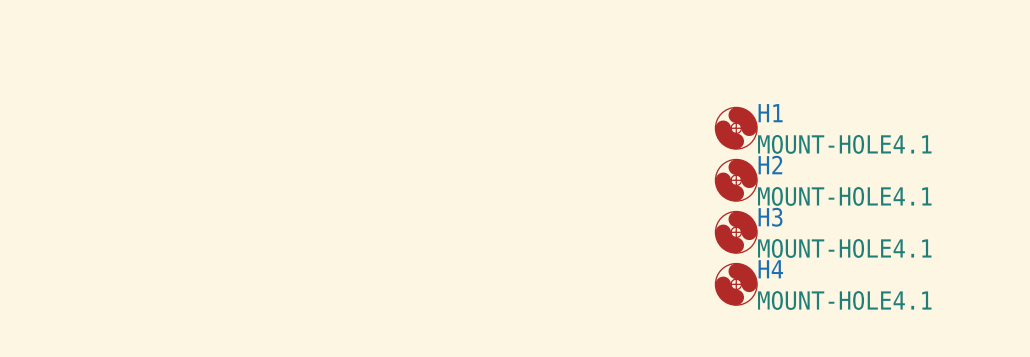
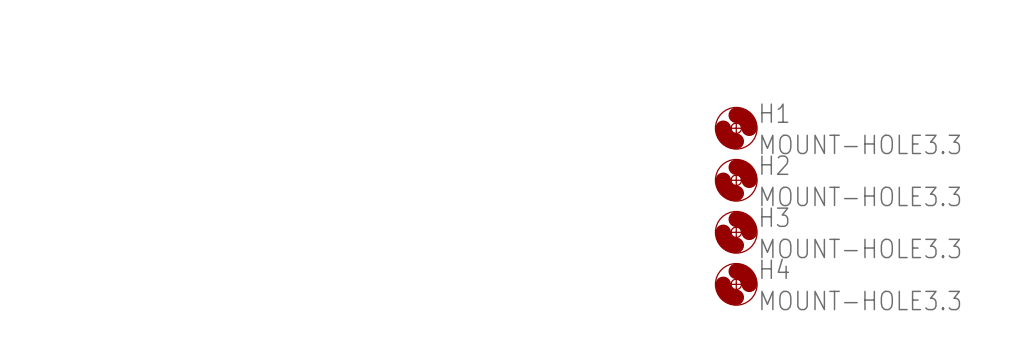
H1 value: MOUNT-HOLE4.1 (844, 144) -> MOUNT-HOLE3.3 (860, 144)
H2 value: MOUNT-HOLE4.1 (844, 196) -> MOUNT-HOLE3.3 (860, 196)
H3 value: MOUNT-HOLE4.1 (844, 248) -> MOUNT-HOLE3.3 (860, 248)
H4 value: MOUNT-HOLE4.1 (844, 300) -> MOUNT-HOLE3.3 (860, 300)

